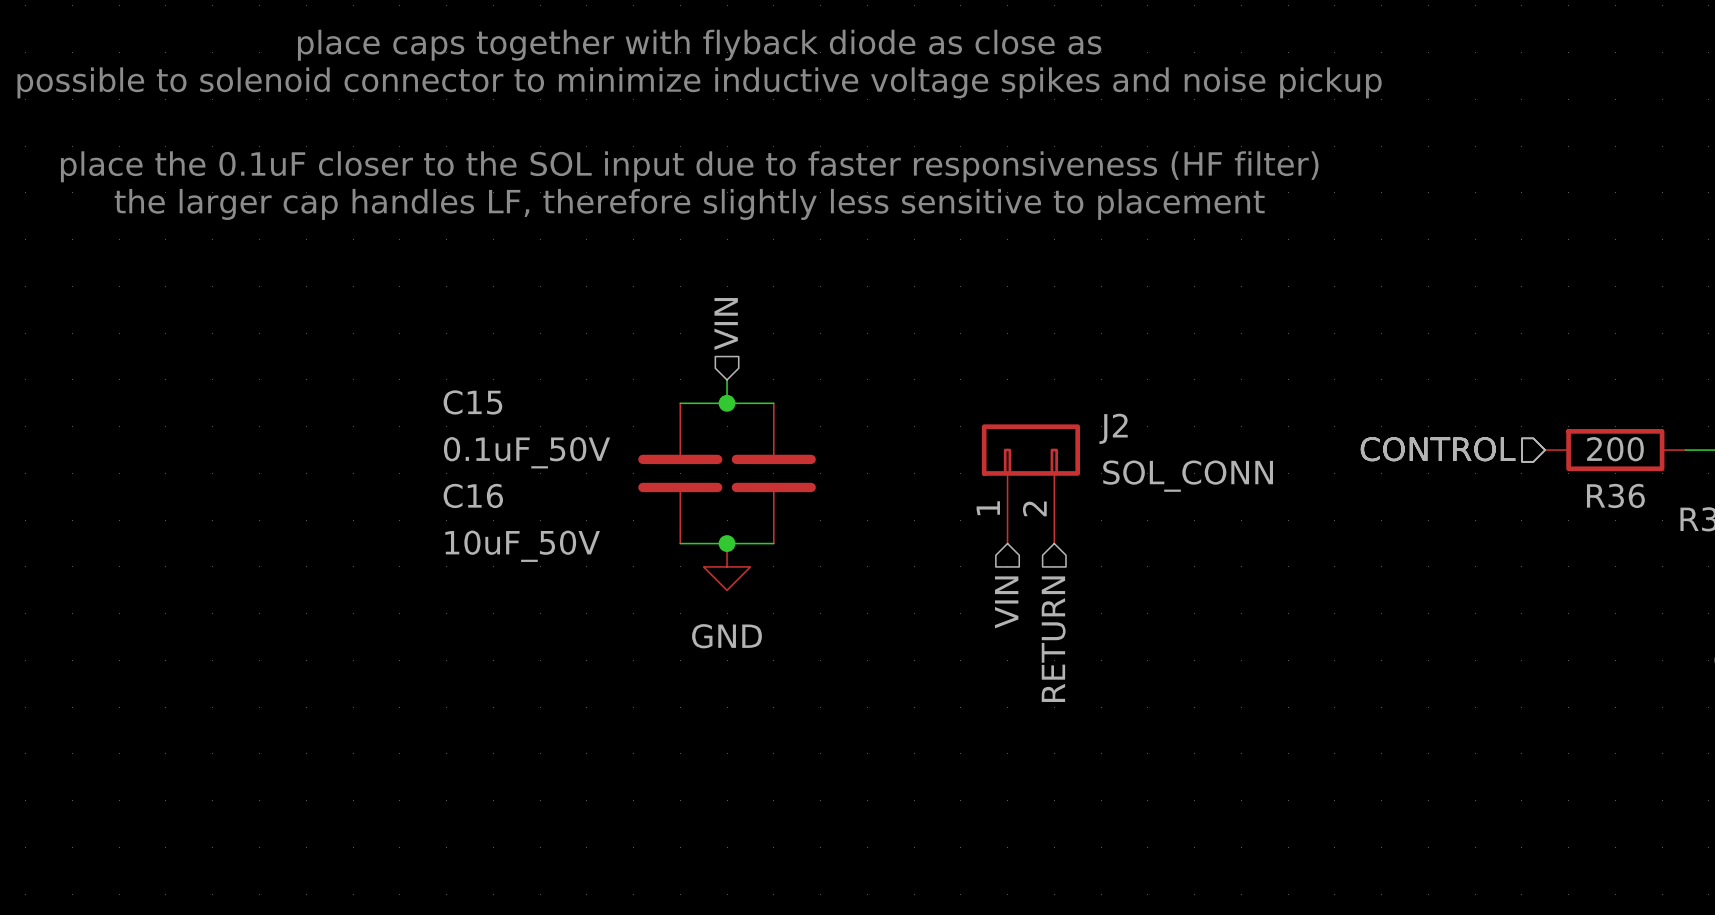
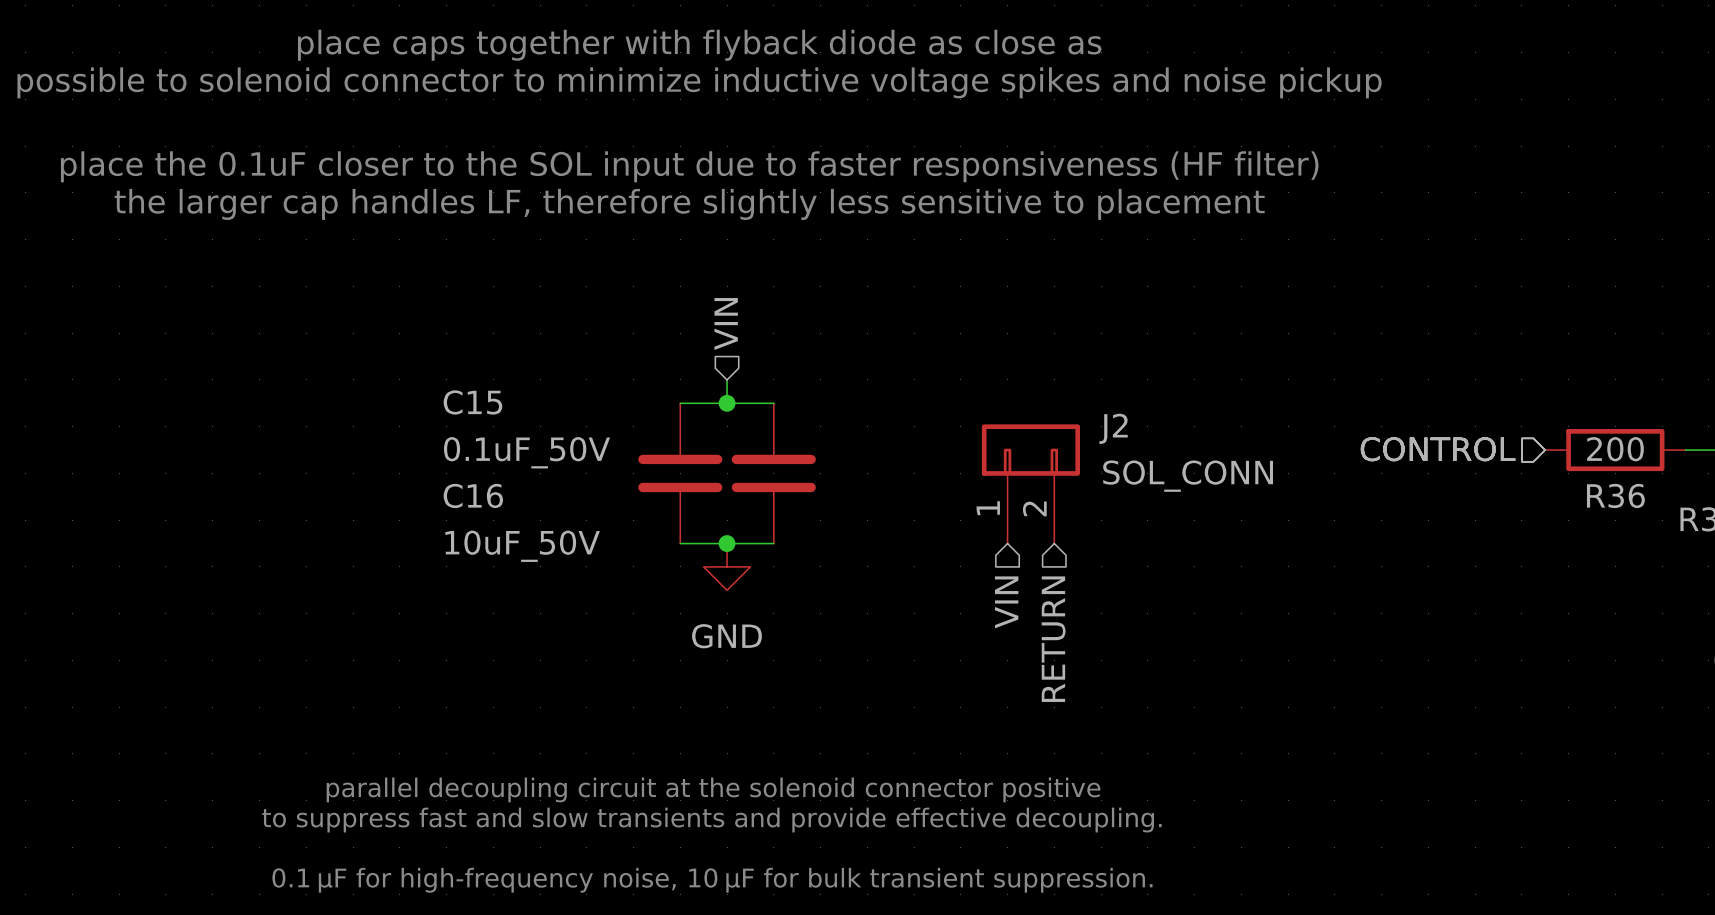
text: none -> parallel decoupling circuit at the solenoid connector positive (713, 789)
text: none -> to suppress fast and slow transients and provide effective decoupling. (711, 820)
text: none -> 0.1 µF for high-frequency noise, 10 µF for bulk transient suppression. (712, 880)

